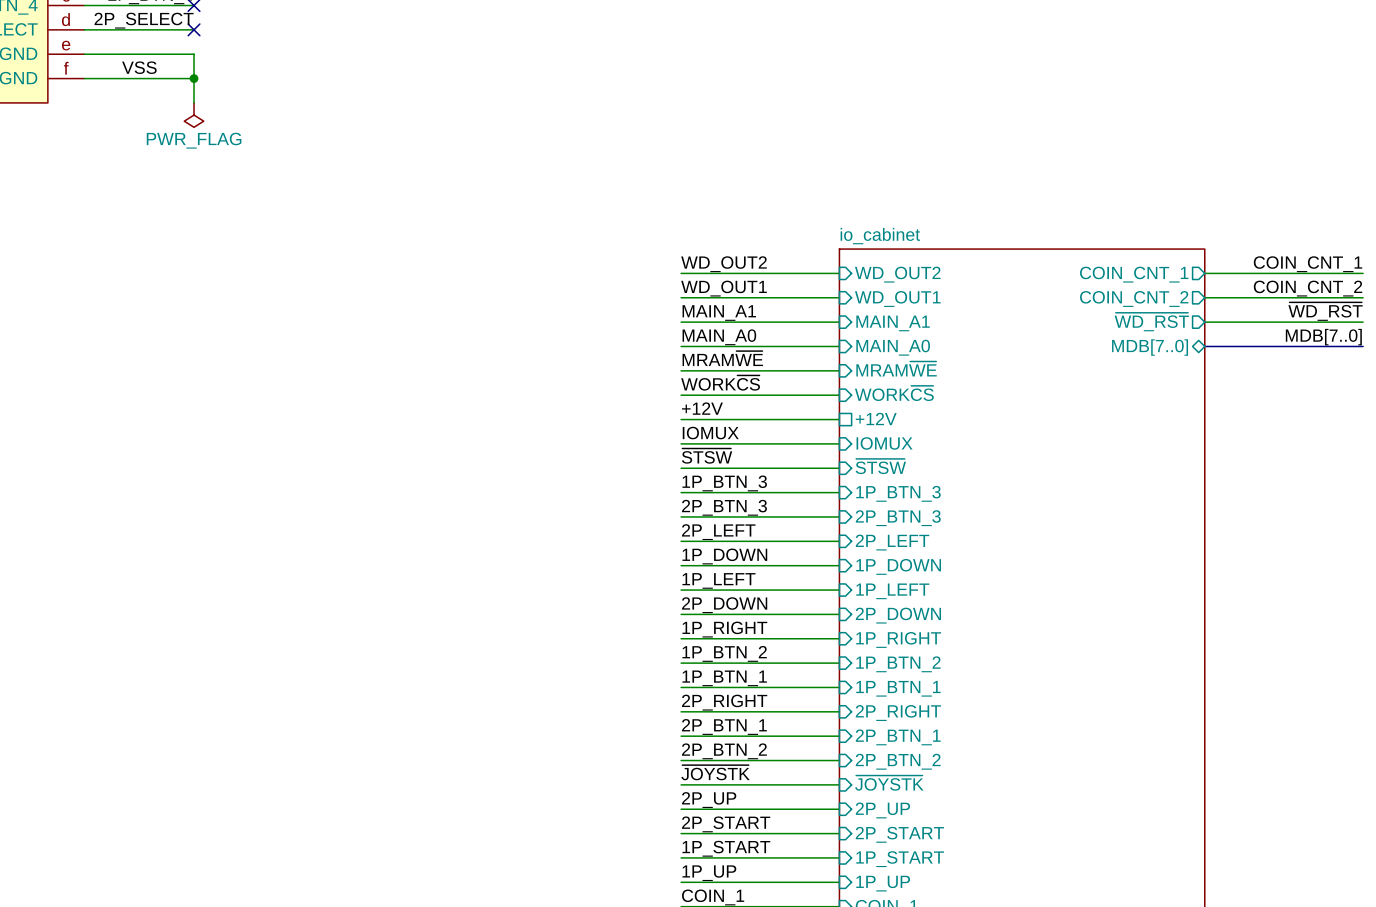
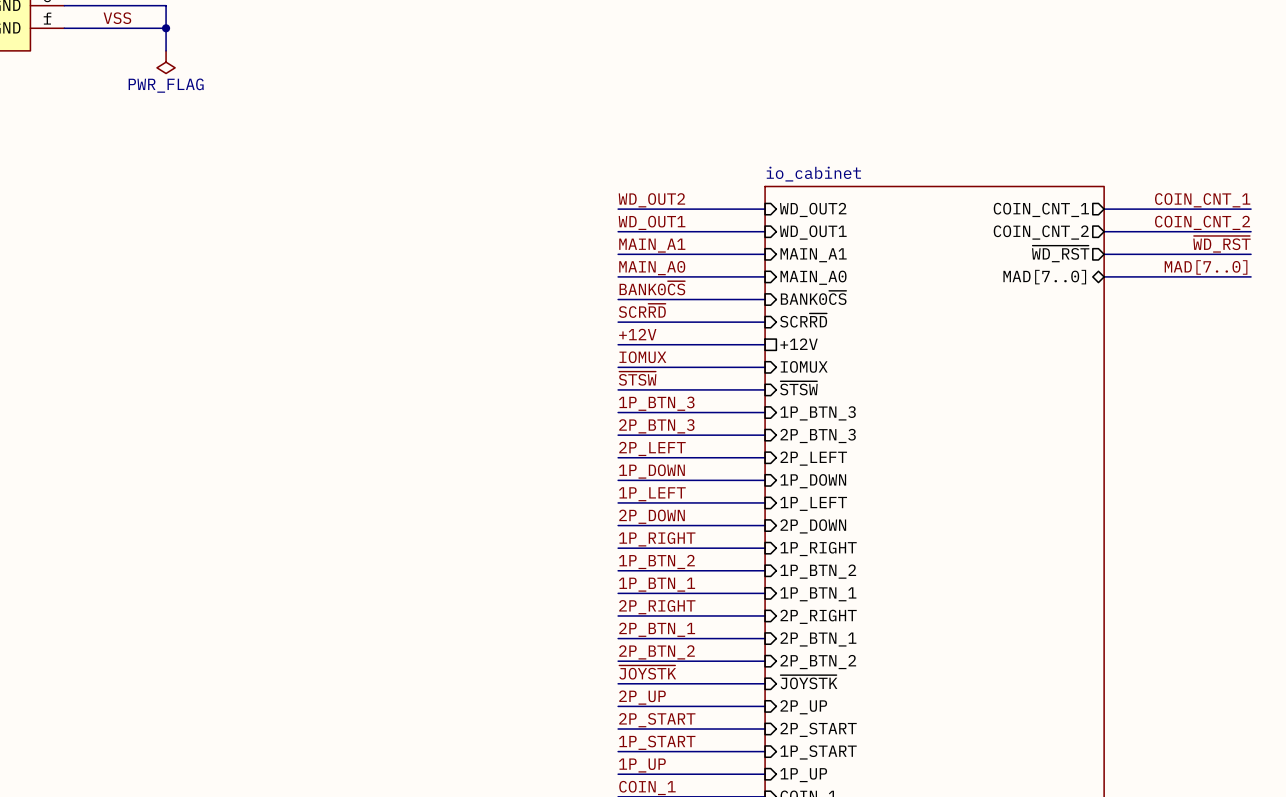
label: MDB[7..0] (1323, 337) -> MAD[7..0] (1206, 267)
sheet pin: MDB[7..0] (1150, 347) -> MAD[7..0] (1044, 277)
label: MRAM~{WE} (722, 358) -> BANK0~{CS} (652, 288)
sheet pin: MRAM~{WE} (896, 368) -> BANK0~{CS} (813, 297)
label: WORK~{CS} (720, 383) -> SCR~{RD} (642, 310)
sheet pin: WORK~{CS} (894, 393) -> SCR~{RD} (803, 320)

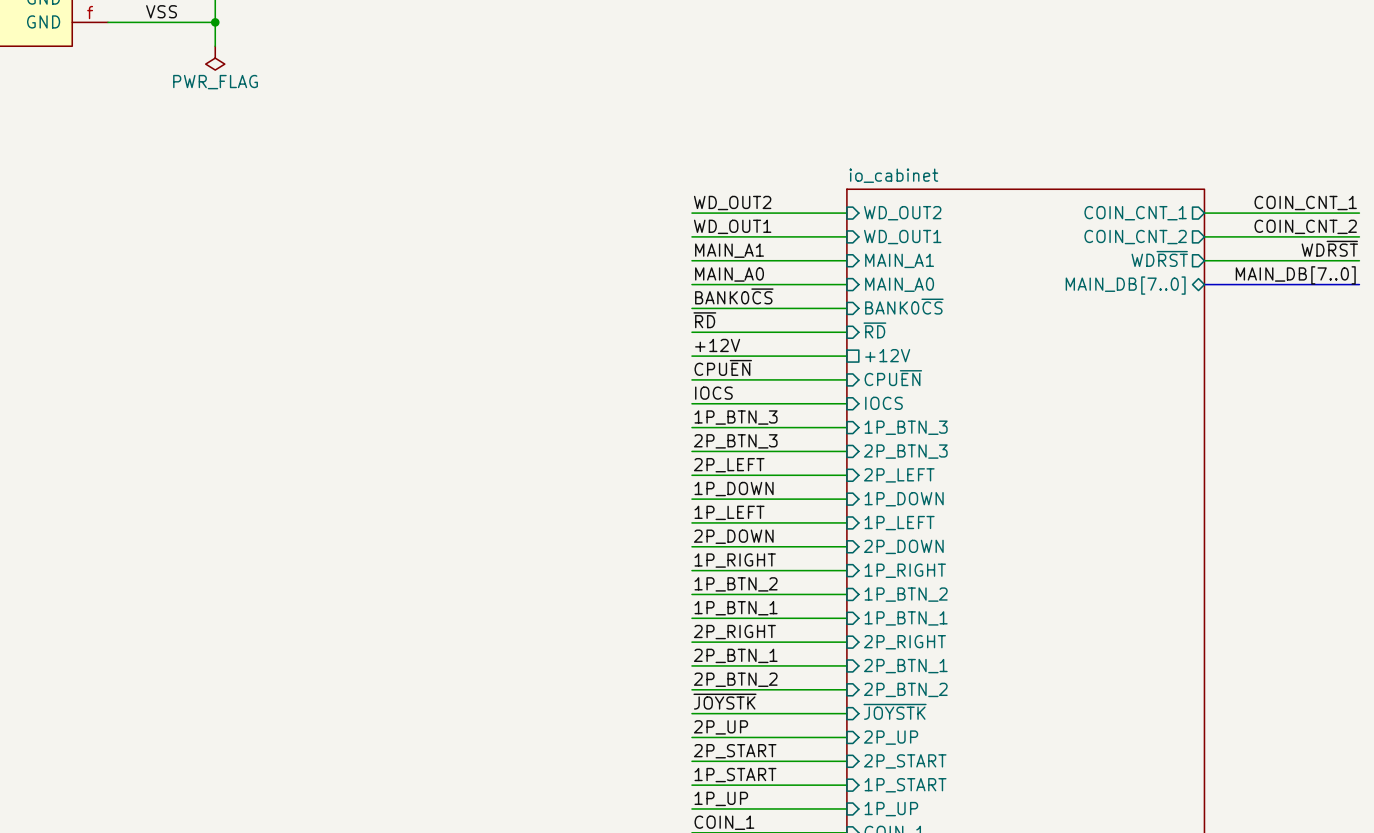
label: ~{WD_RST} (1221, 244) -> WD~{RST} (1329, 248)
sheet pin: ~{WD_RST} (1060, 253) -> WD~{RST} (1159, 258)
label: MAD[7..0] (1206, 267) -> MAIN_DB[7..0] (1295, 275)
sheet pin: MAD[7..0] (1044, 277) -> MAIN_DB[7..0] (1125, 285)
label: SCR~{RD} (642, 310) -> ~{RD} (704, 320)
sheet pin: SCR~{RD} (803, 320) -> ~{RD} (874, 330)
label: IOMUX (642, 357) -> CPU~{EN} (723, 367)
sheet pin: IOMUX (804, 366) -> CPU~{EN} (893, 378)
label: ~{STSW} (637, 378) -> IOCS (713, 393)
sheet pin: ~{STSW} (798, 388) -> IOCS (883, 403)

